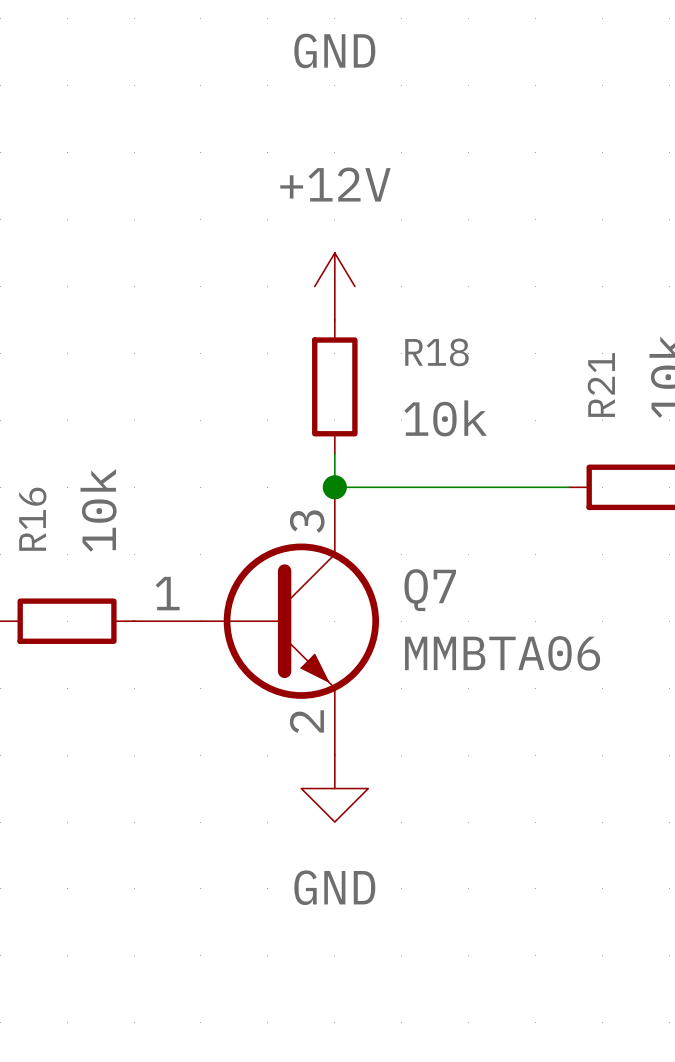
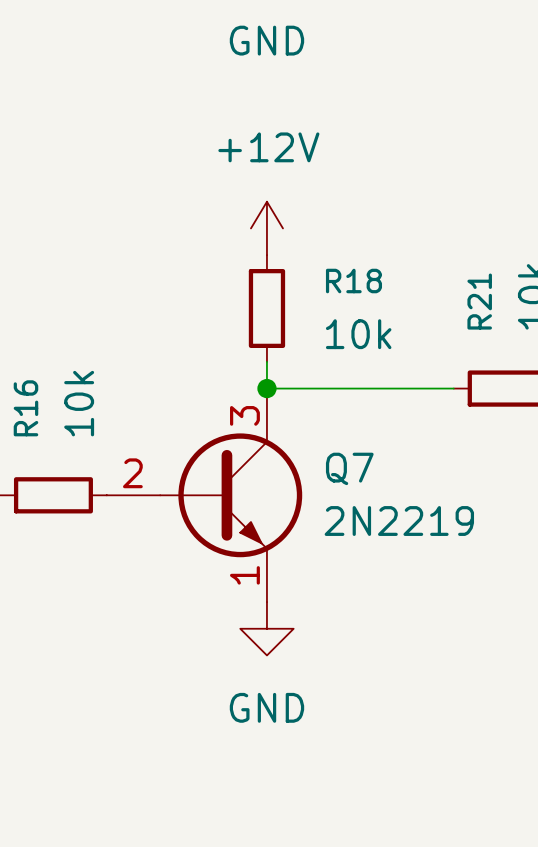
Q7 pin number: 1 (167, 593) -> 2 (132, 473)
Q7 value: MMBTA06 (502, 653) -> 2N2219 (399, 521)
Q7 pin number: 2 (306, 721) -> 1 (244, 575)

